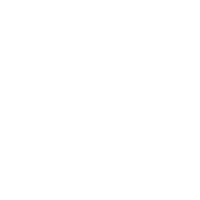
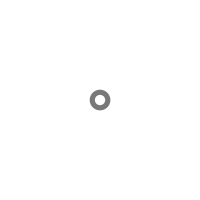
via: none -> (100, 100)

